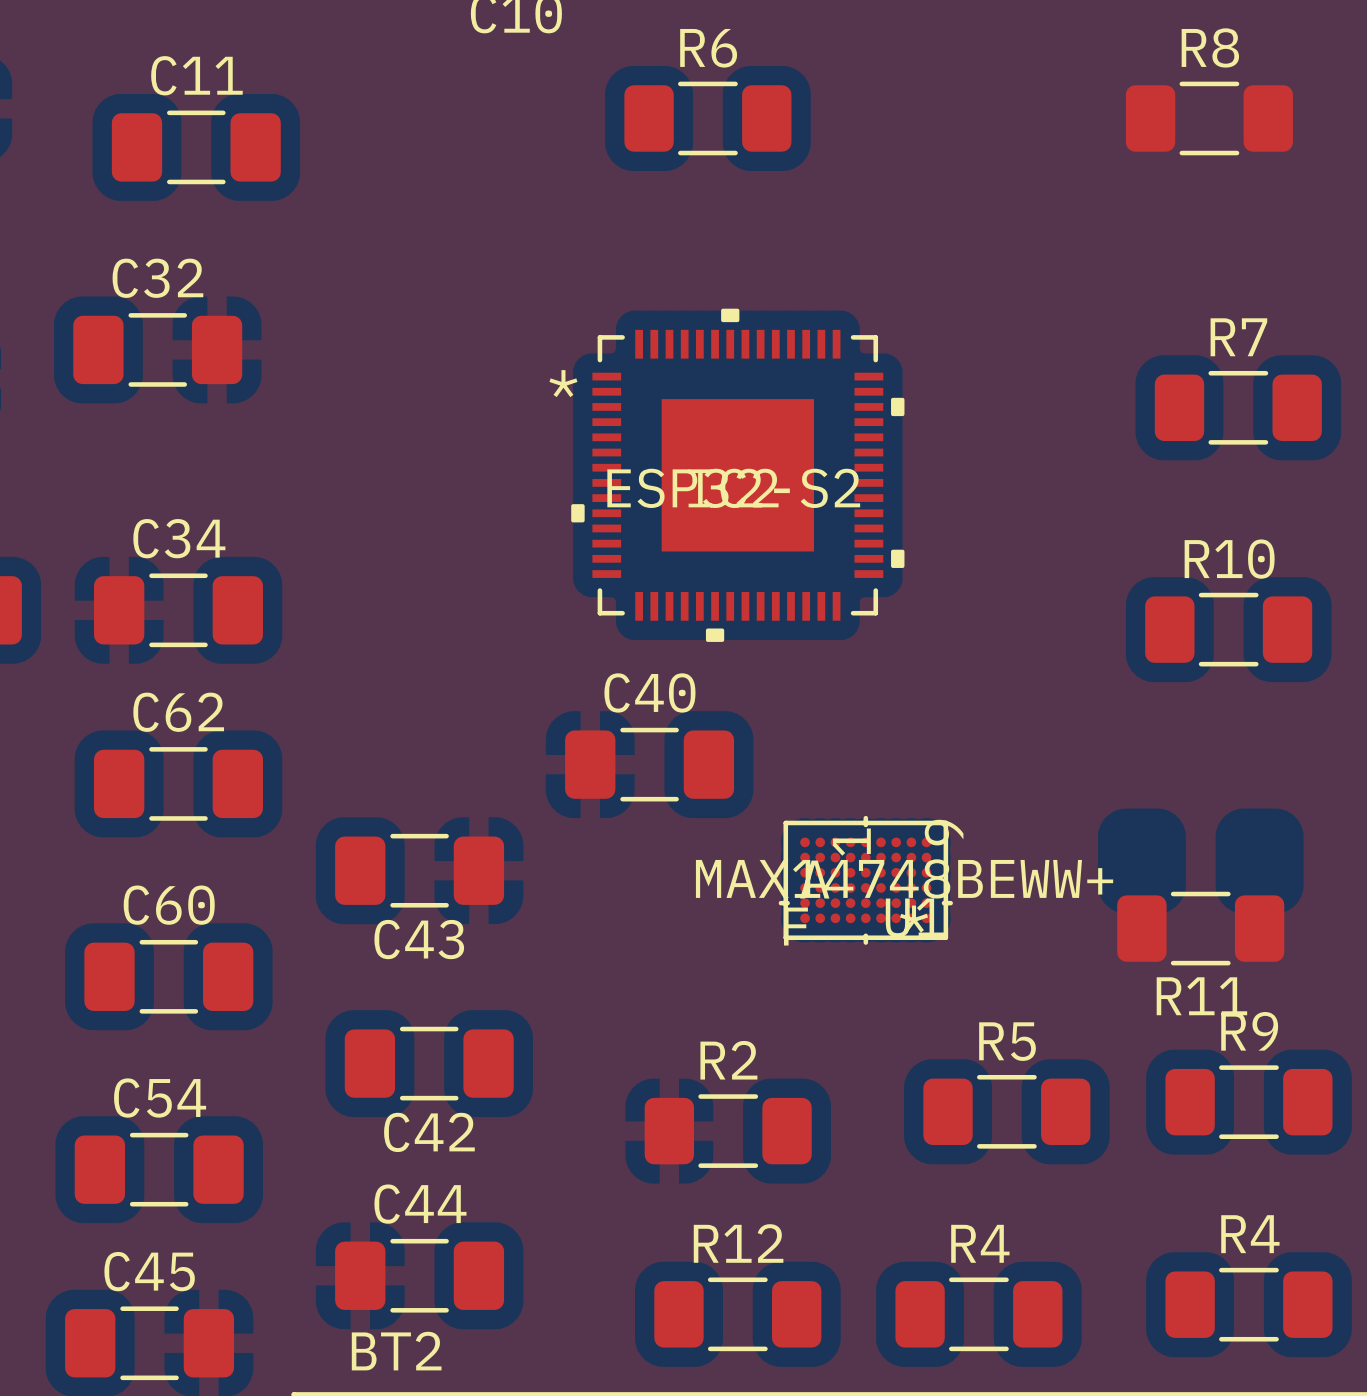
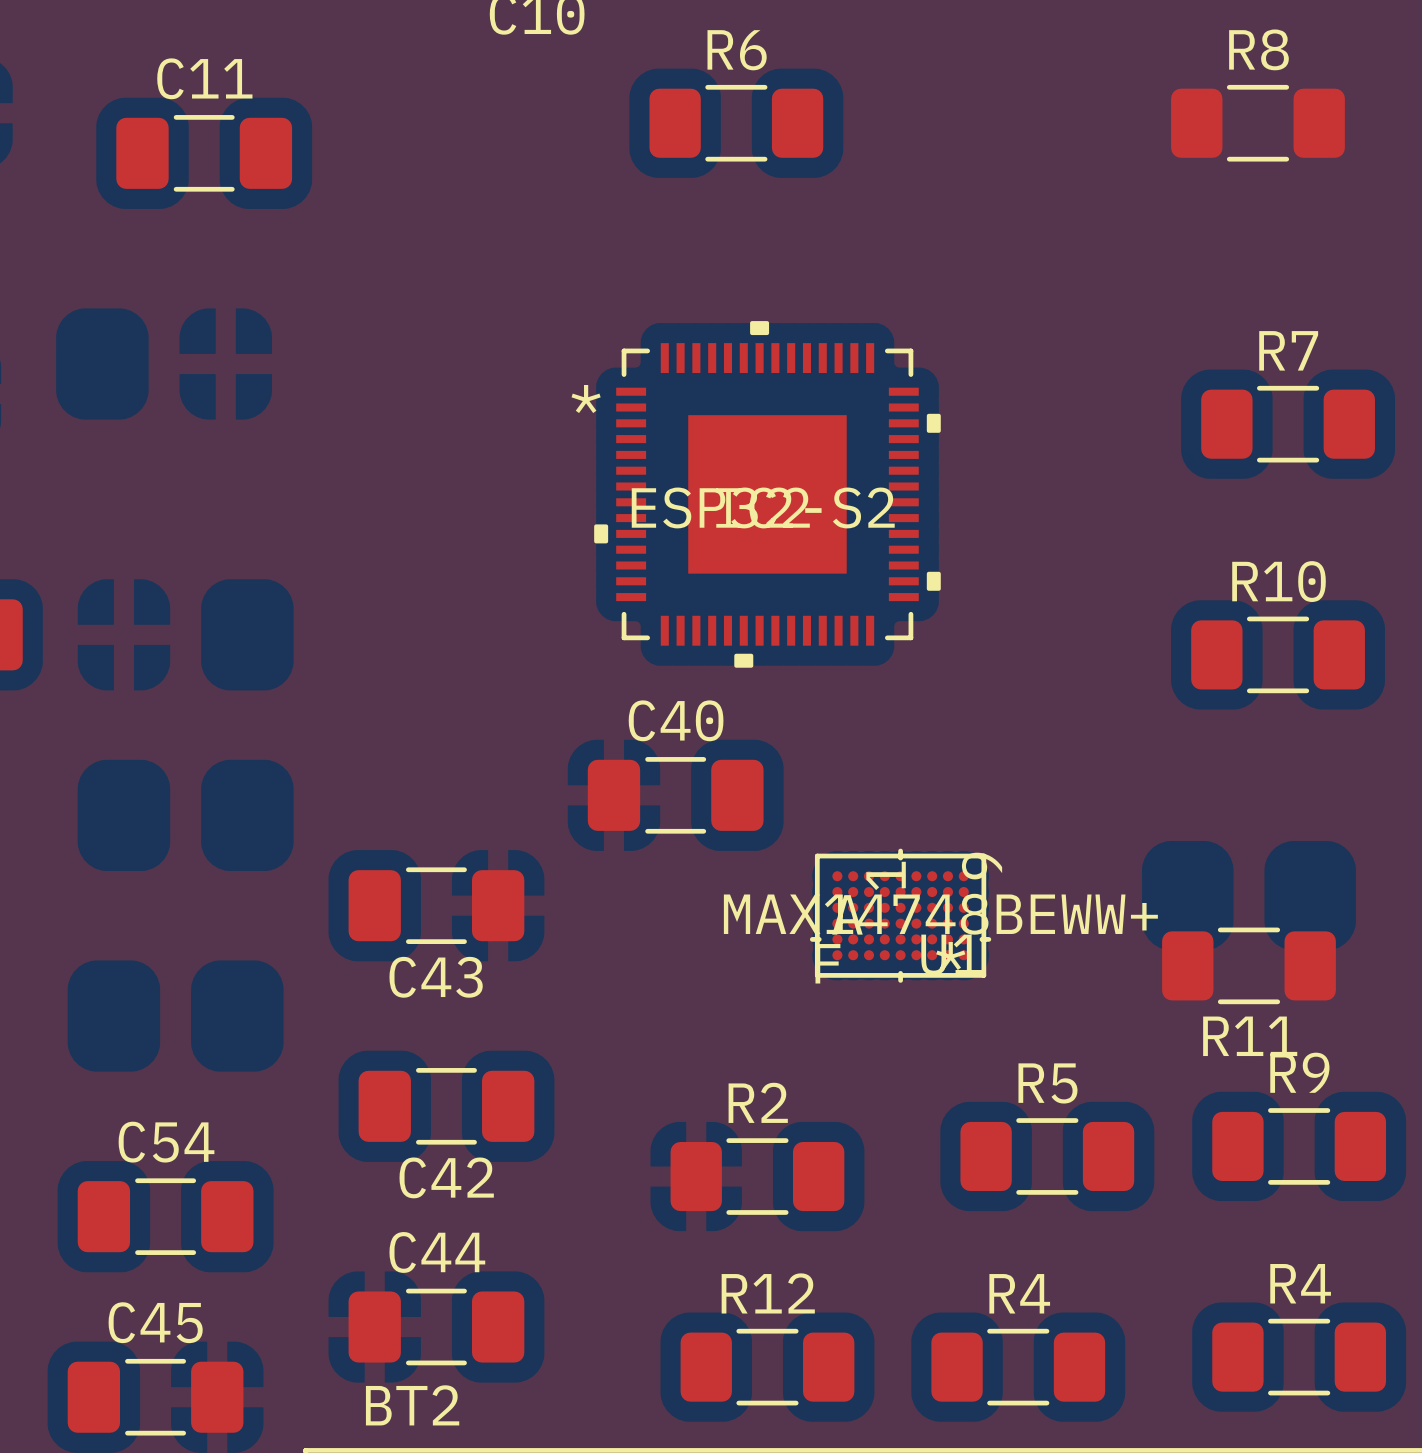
C32: (157, 349) -> none
C34: (178, 610) -> none
C62: (178, 783) -> none
C60: (168, 976) -> none

